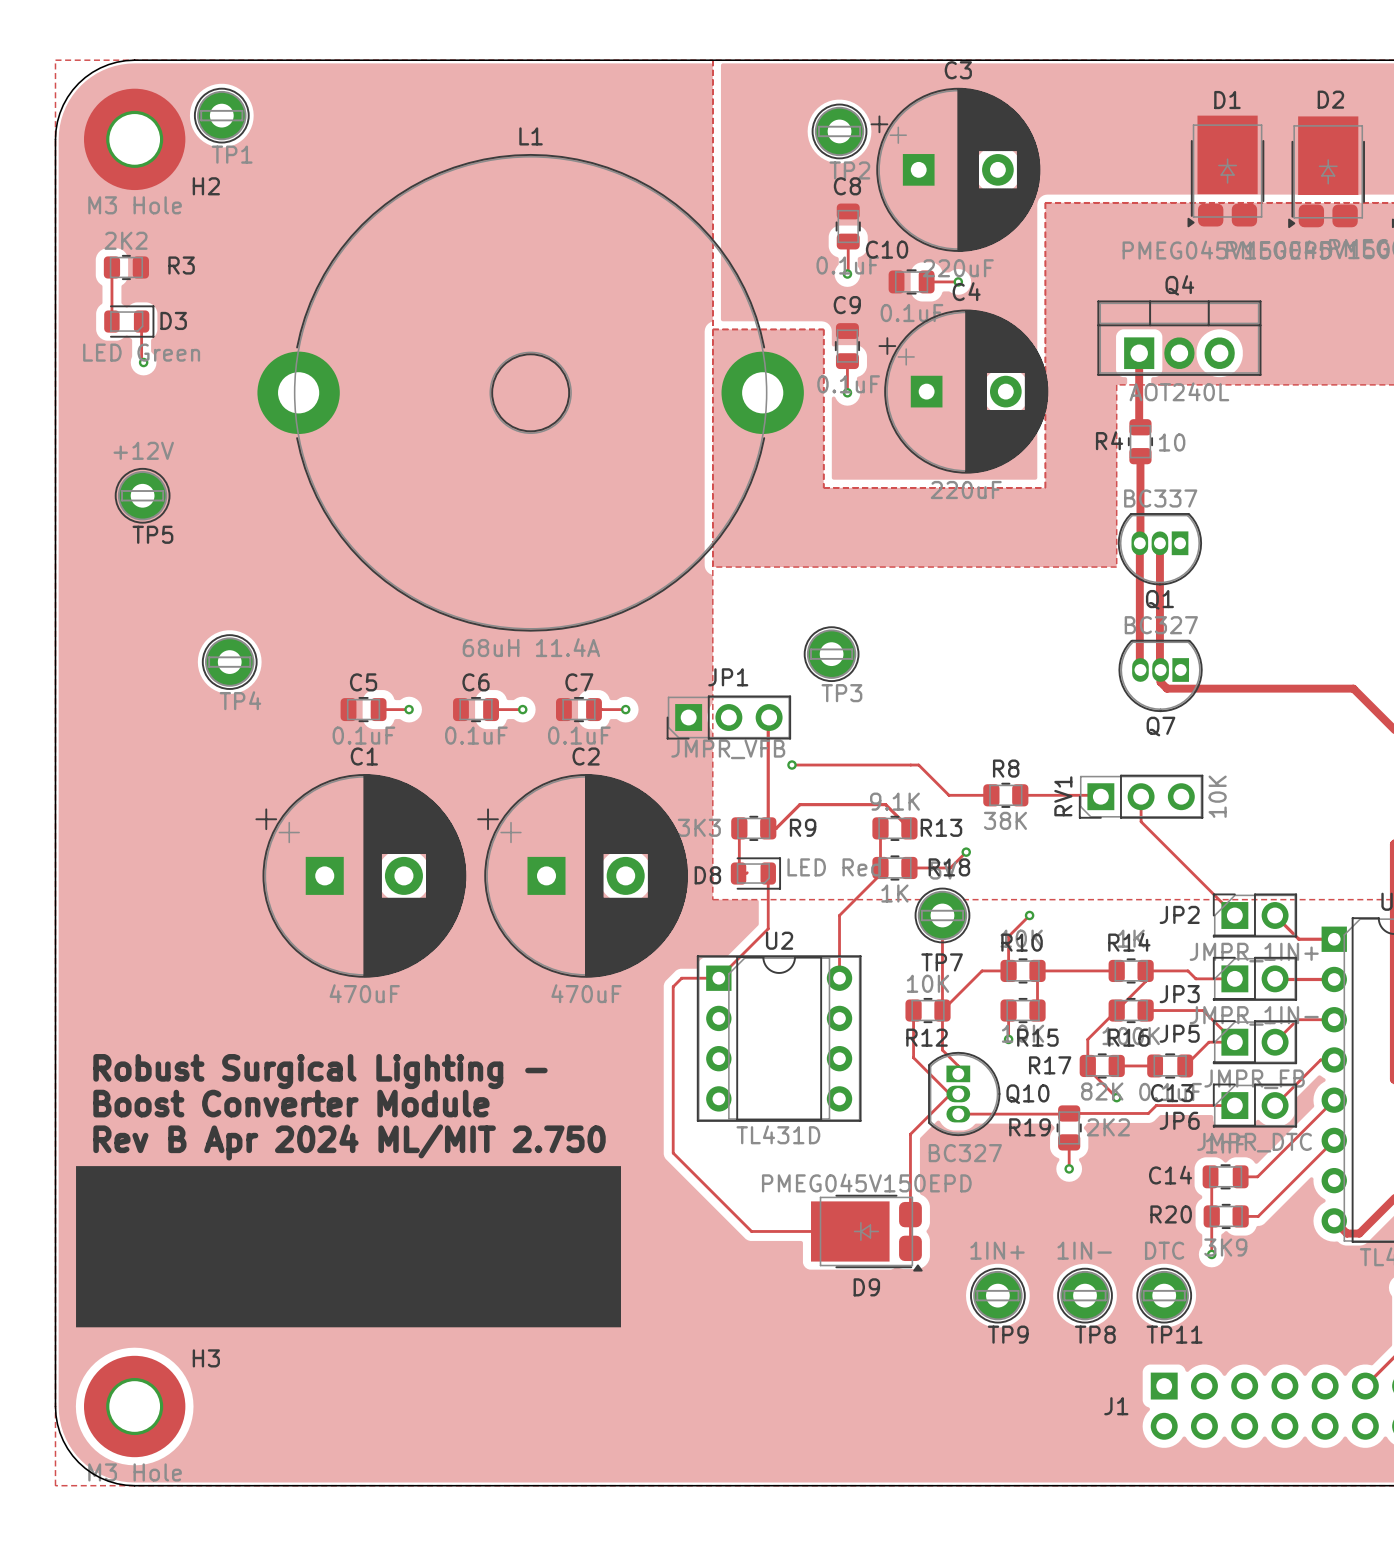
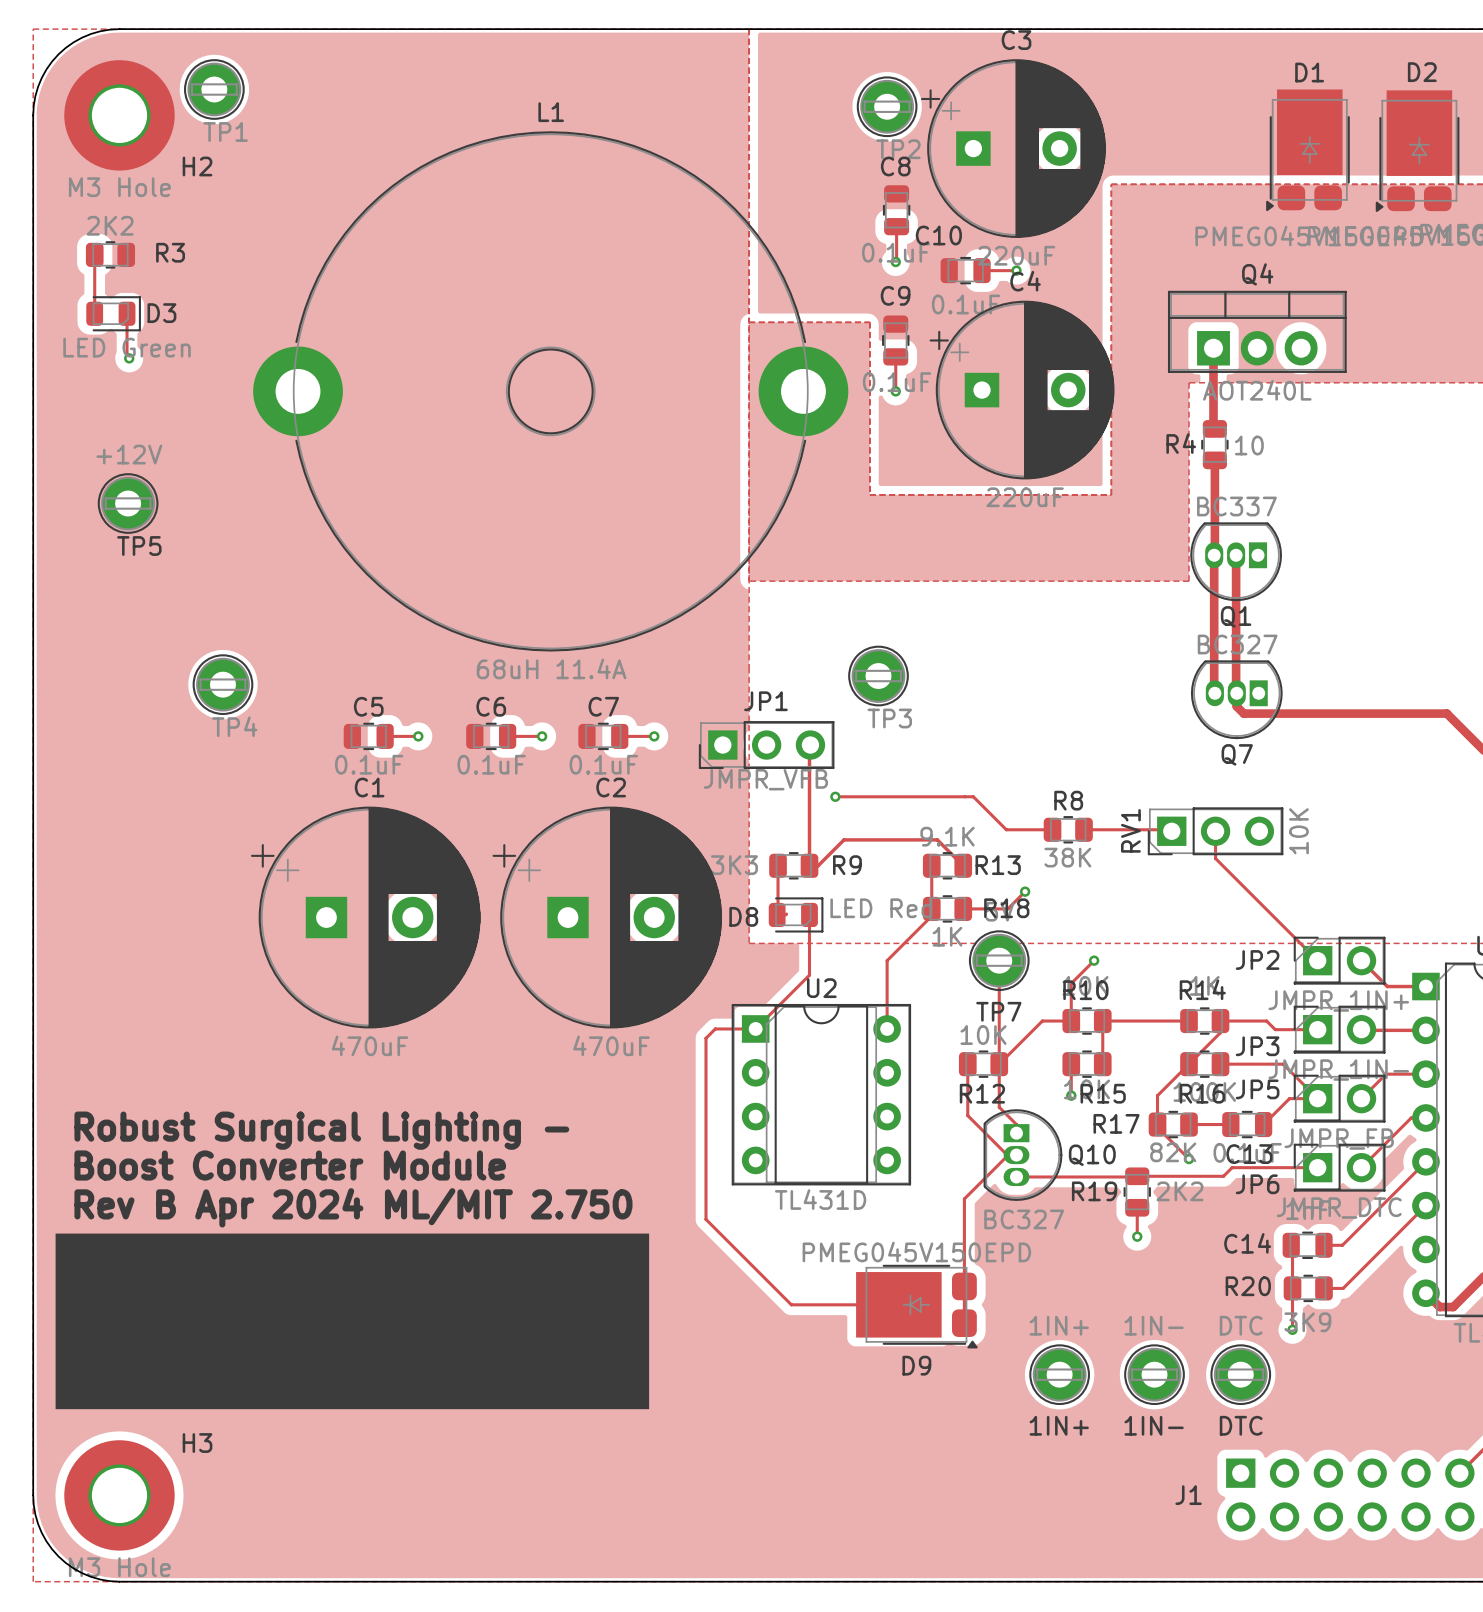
TP9 name: TP9 (1008, 1334) -> 1IN+ (1059, 1425)
TP8 name: TP8 (1095, 1334) -> 1IN- (1154, 1425)
TP11 name: TP11 (1174, 1334) -> DTC (1241, 1425)

